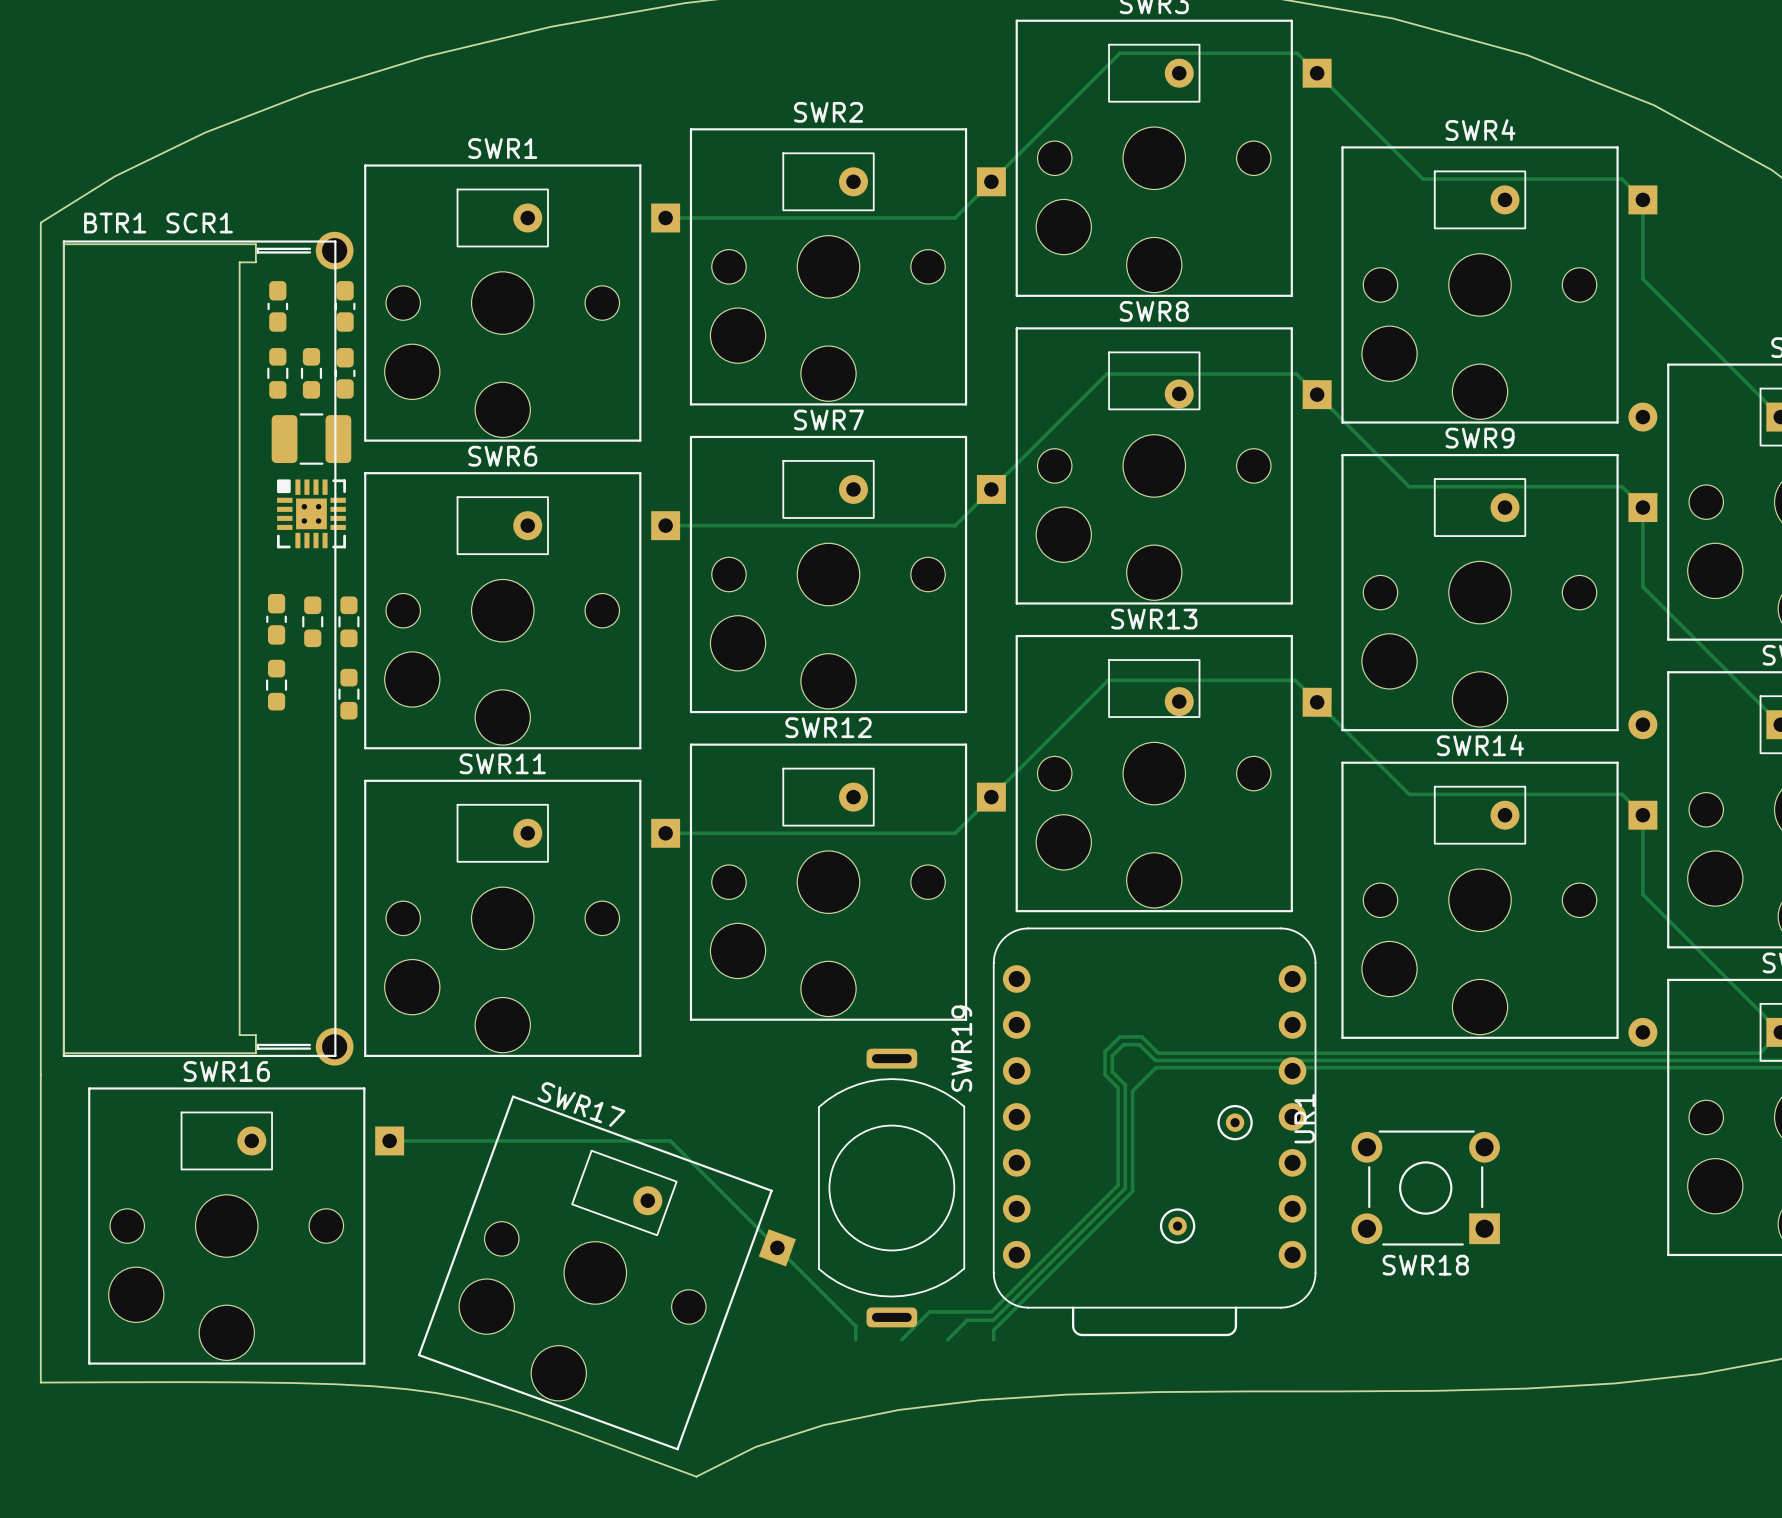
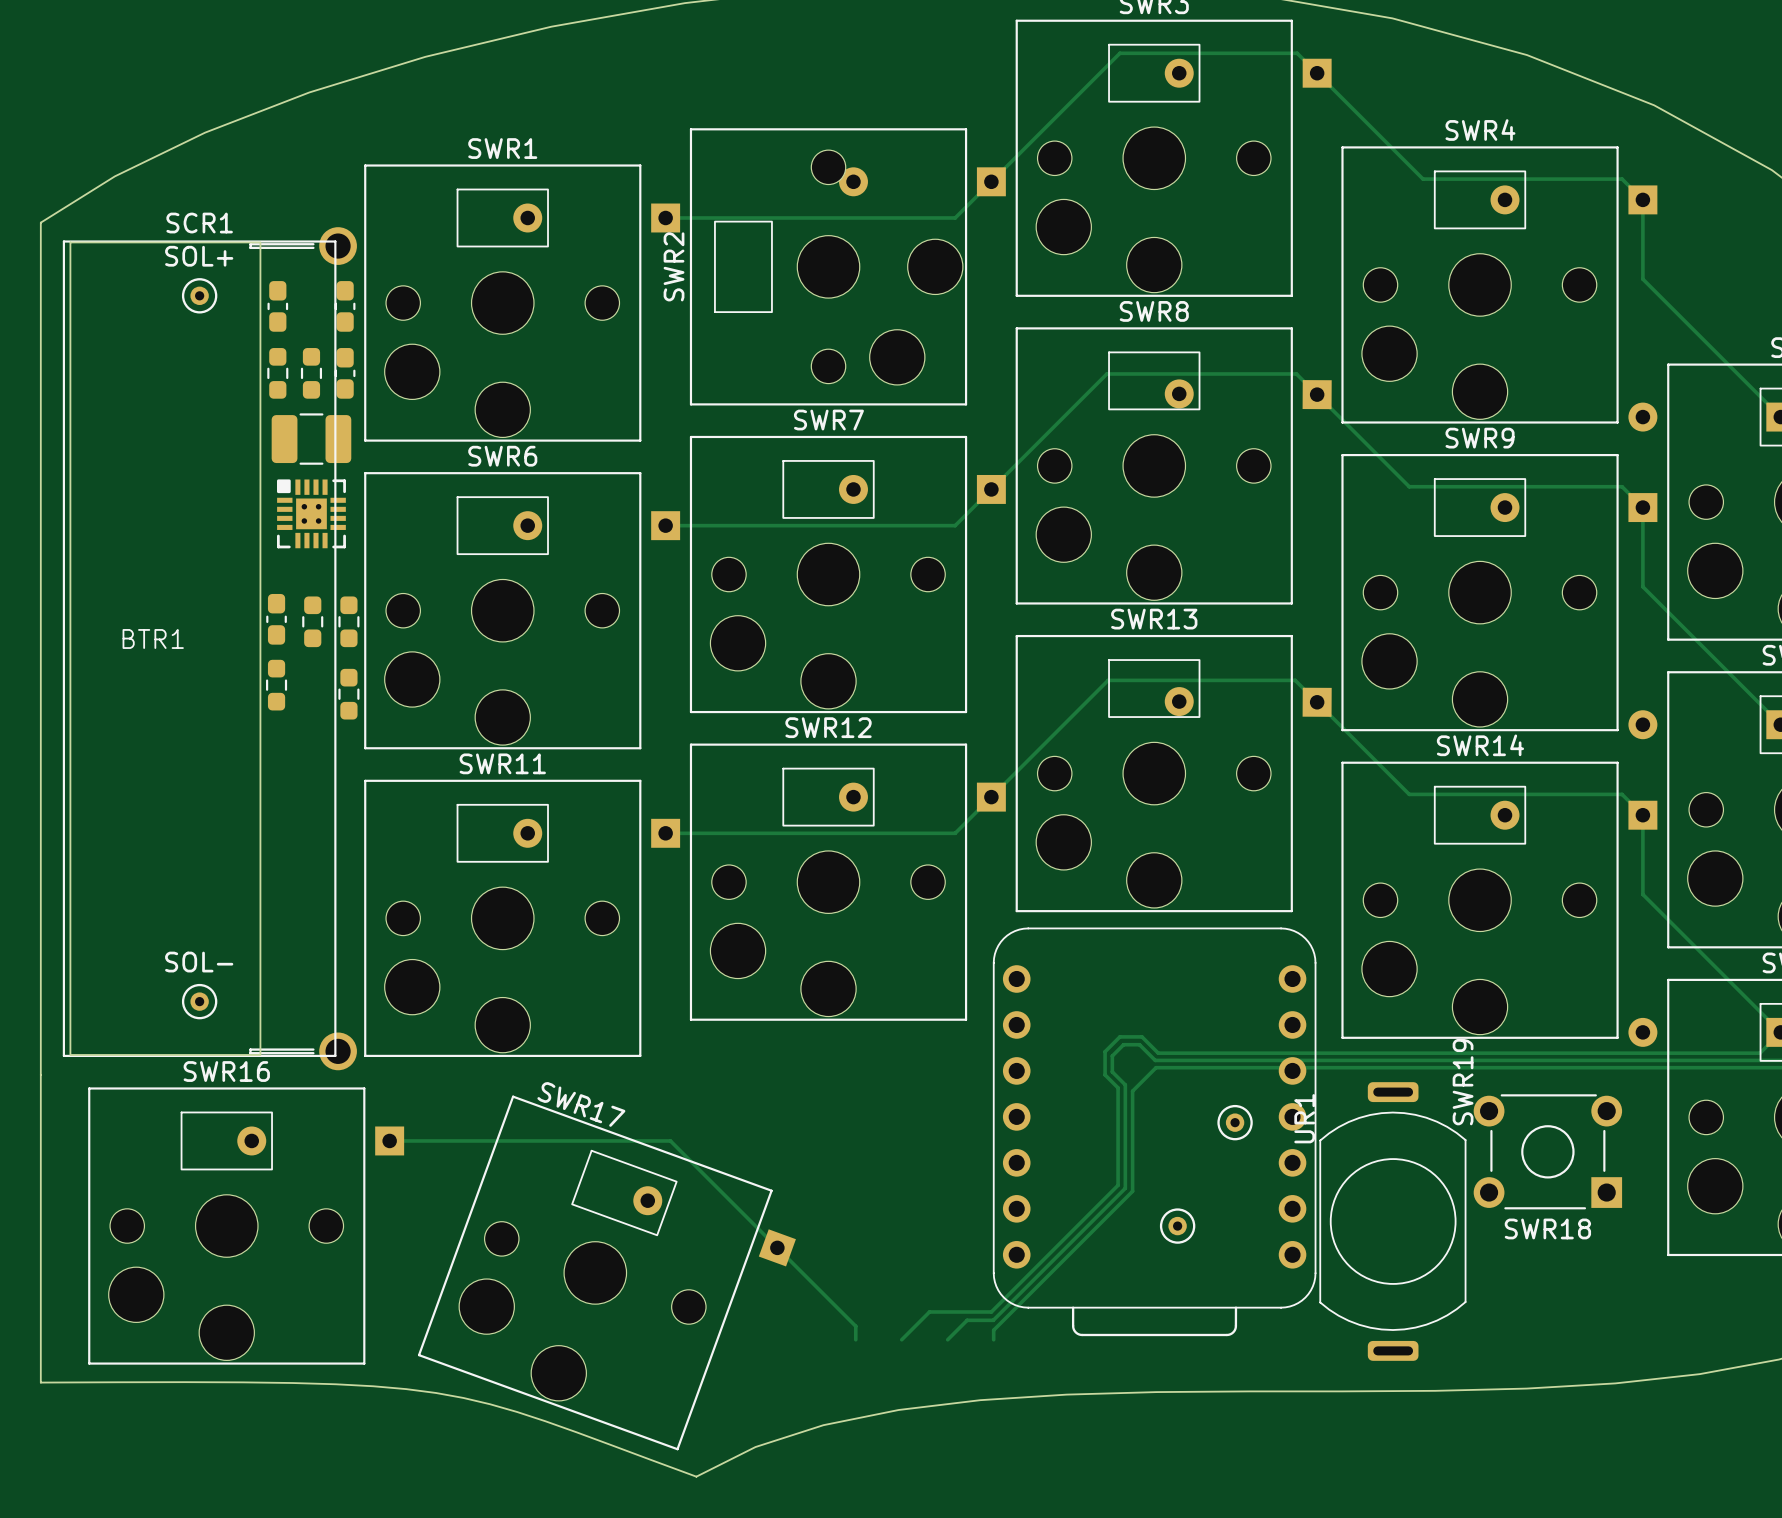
BTR1 name position: BTR1 (115, 223) -> BTR1 (153, 638)
BTR1 footprint: [63, 231, 354, 1066] -> [69, 227, 357, 1071]
SCR1 footprint: [62, 240, 337, 1057] -> [62, 240, 337, 1057]
SWR2 rotation: 0° (828, 266) -> 90° counterclockwise (828, 266)
SWR19 position: (891, 1188) -> (1392, 1221)
SWR18 position: (1425, 1188) -> (1547, 1151)

